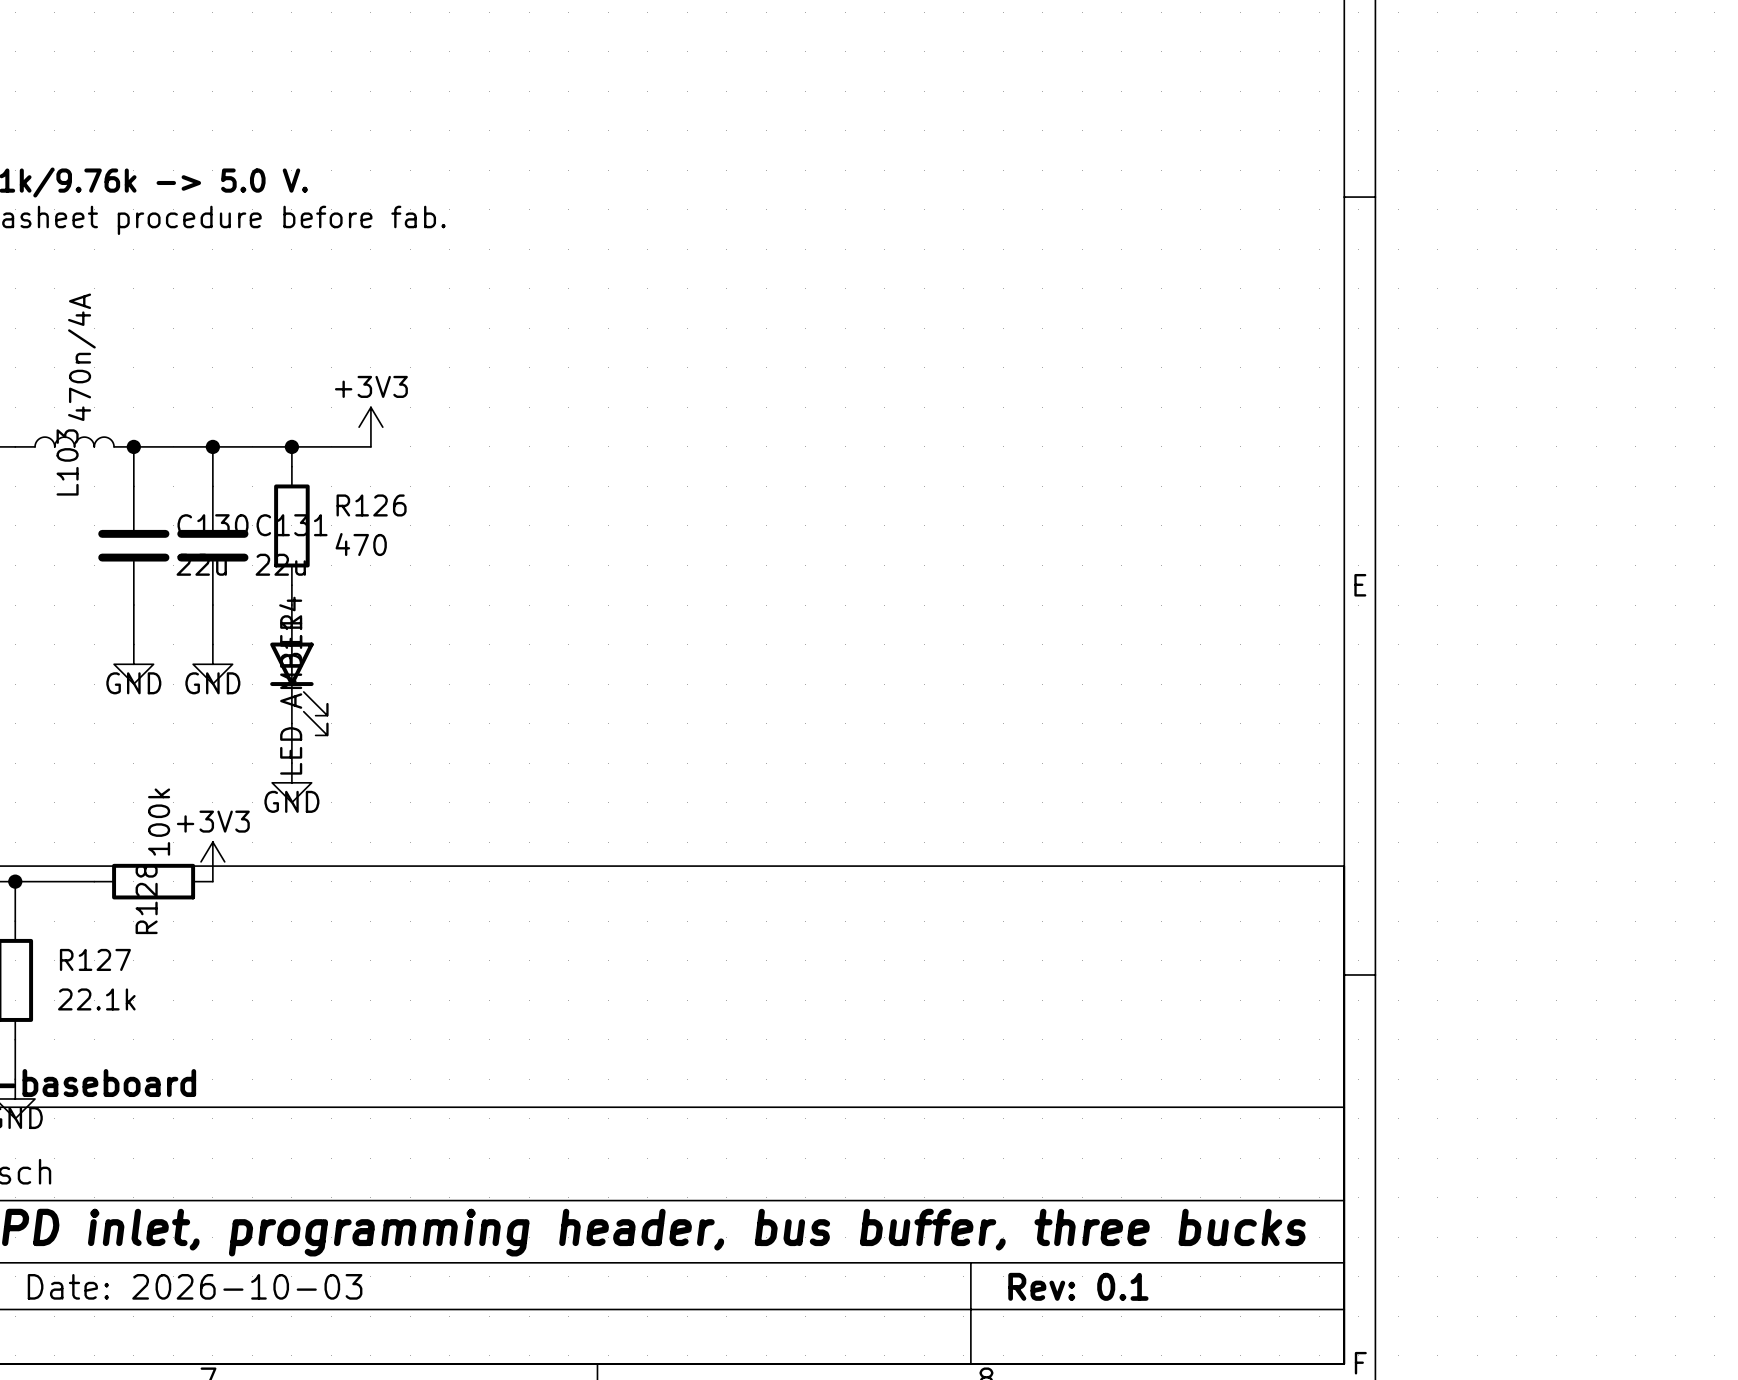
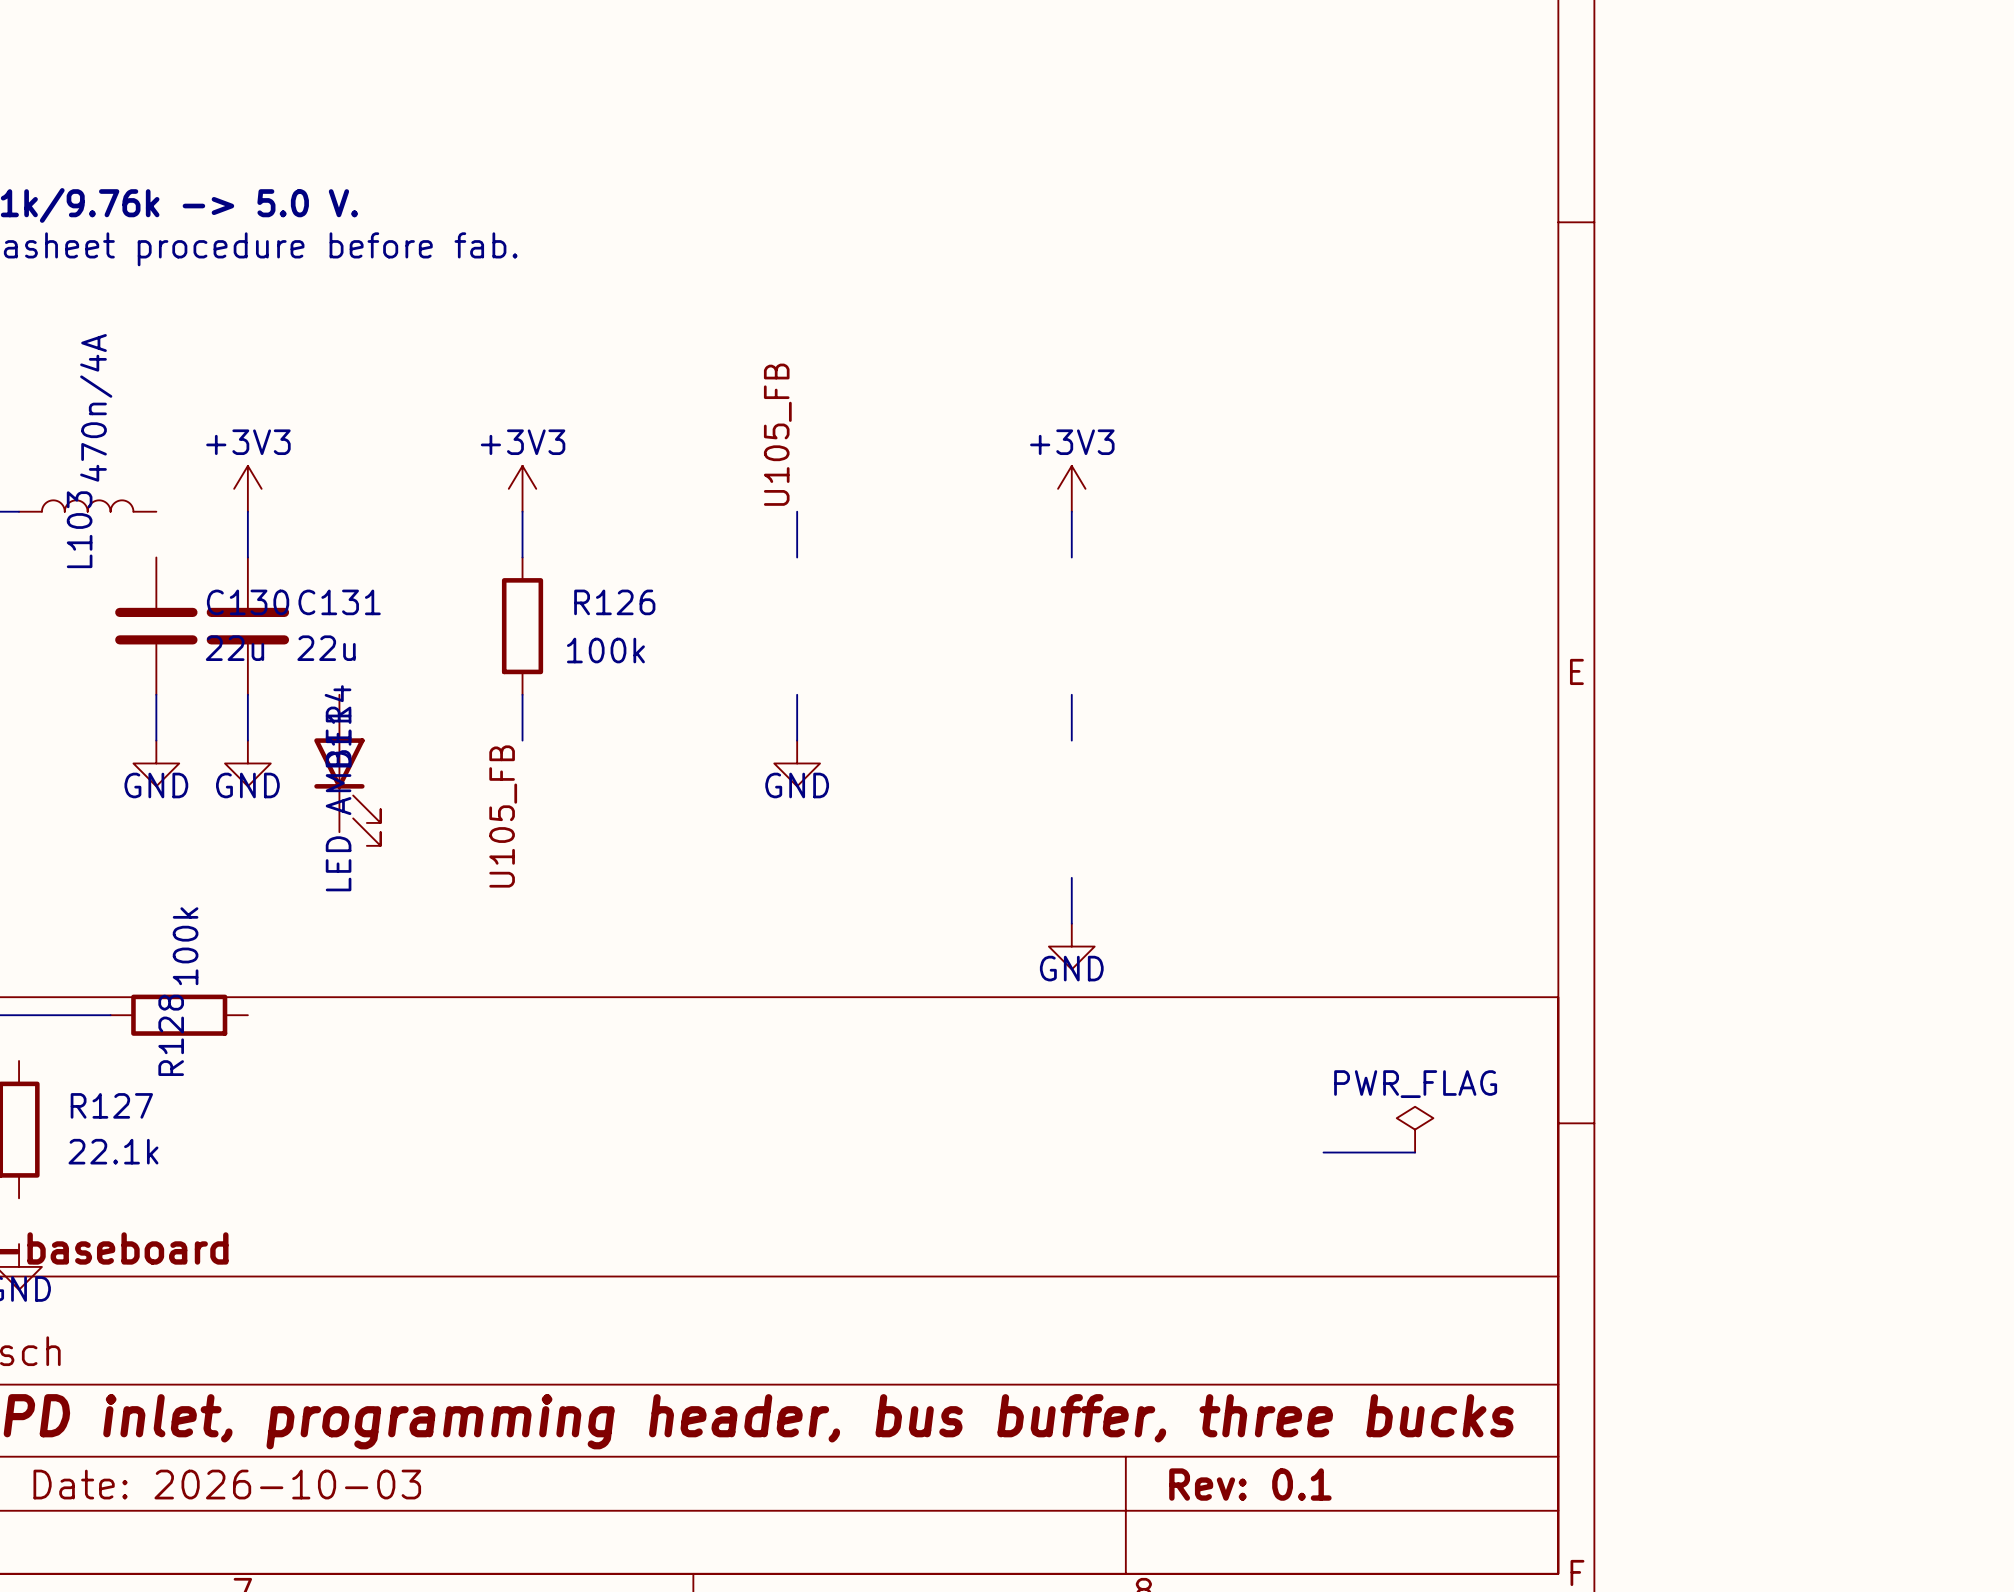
label: none -> U105_FB (777, 434)
power symbol: none -> +3V3 (247, 488)
power symbol: +3V3 (370, 427) -> none
power symbol: none -> +3V3 (522, 488)
power symbol: none -> +3V3 (1071, 488)
junction: (133, 446) -> none
junction: (212, 446) -> none
wire: (291, 446) (291, 466) -> none
junction: (291, 446) -> none
wire: (370, 446) (133, 446) (133, 486) -> none
wire: none -> (522, 511) (522, 557)
wire: none -> (797, 511) (797, 557)
wire: none -> (1071, 511) (1071, 557)
R126 position: (291, 525) -> (522, 626)
R126 value: 470 (361, 544) -> 100k (605, 650)
wire: (291, 585) (291, 605) -> none
wire: none -> (797, 694) (797, 740)
wire: none -> (1071, 694) (1071, 740)
power symbol: none -> GND (797, 763)
label: none -> U105_FB (503, 816)
wire: (291, 723) (291, 763) -> (522, 694) (522, 740)
wire: none -> (1071, 877) (1071, 923)
power symbol: GND (291, 782) -> none
power symbol: none -> GND (1071, 946)
power symbol: +3V3 (212, 861) -> none
wire: (15, 881) (15, 921) -> none
junction: (15, 881) -> none
power symbol: none -> PWR_FLAG (1415, 1129)
wire: none -> (1323, 1152) (1415, 1152)
wire: (15, 1039) (15, 1079) -> none

